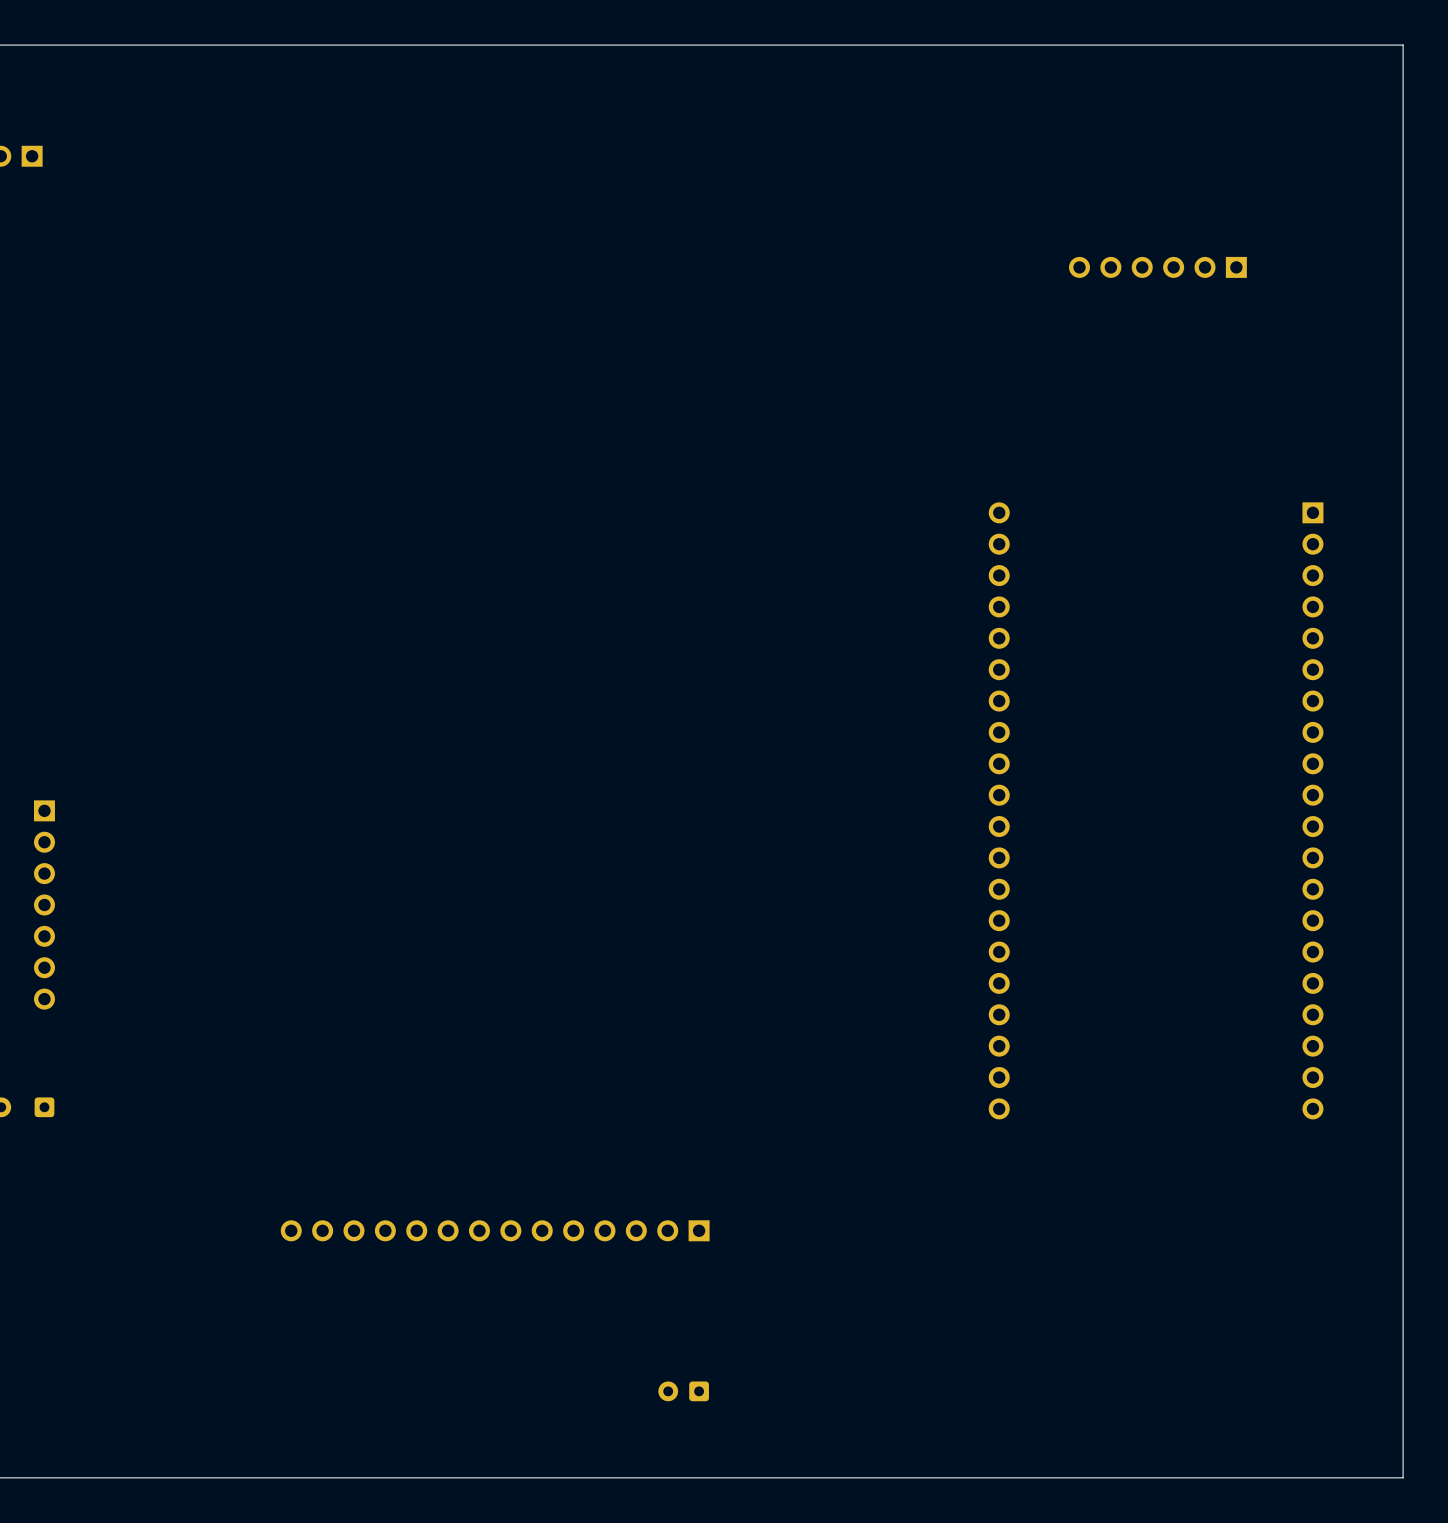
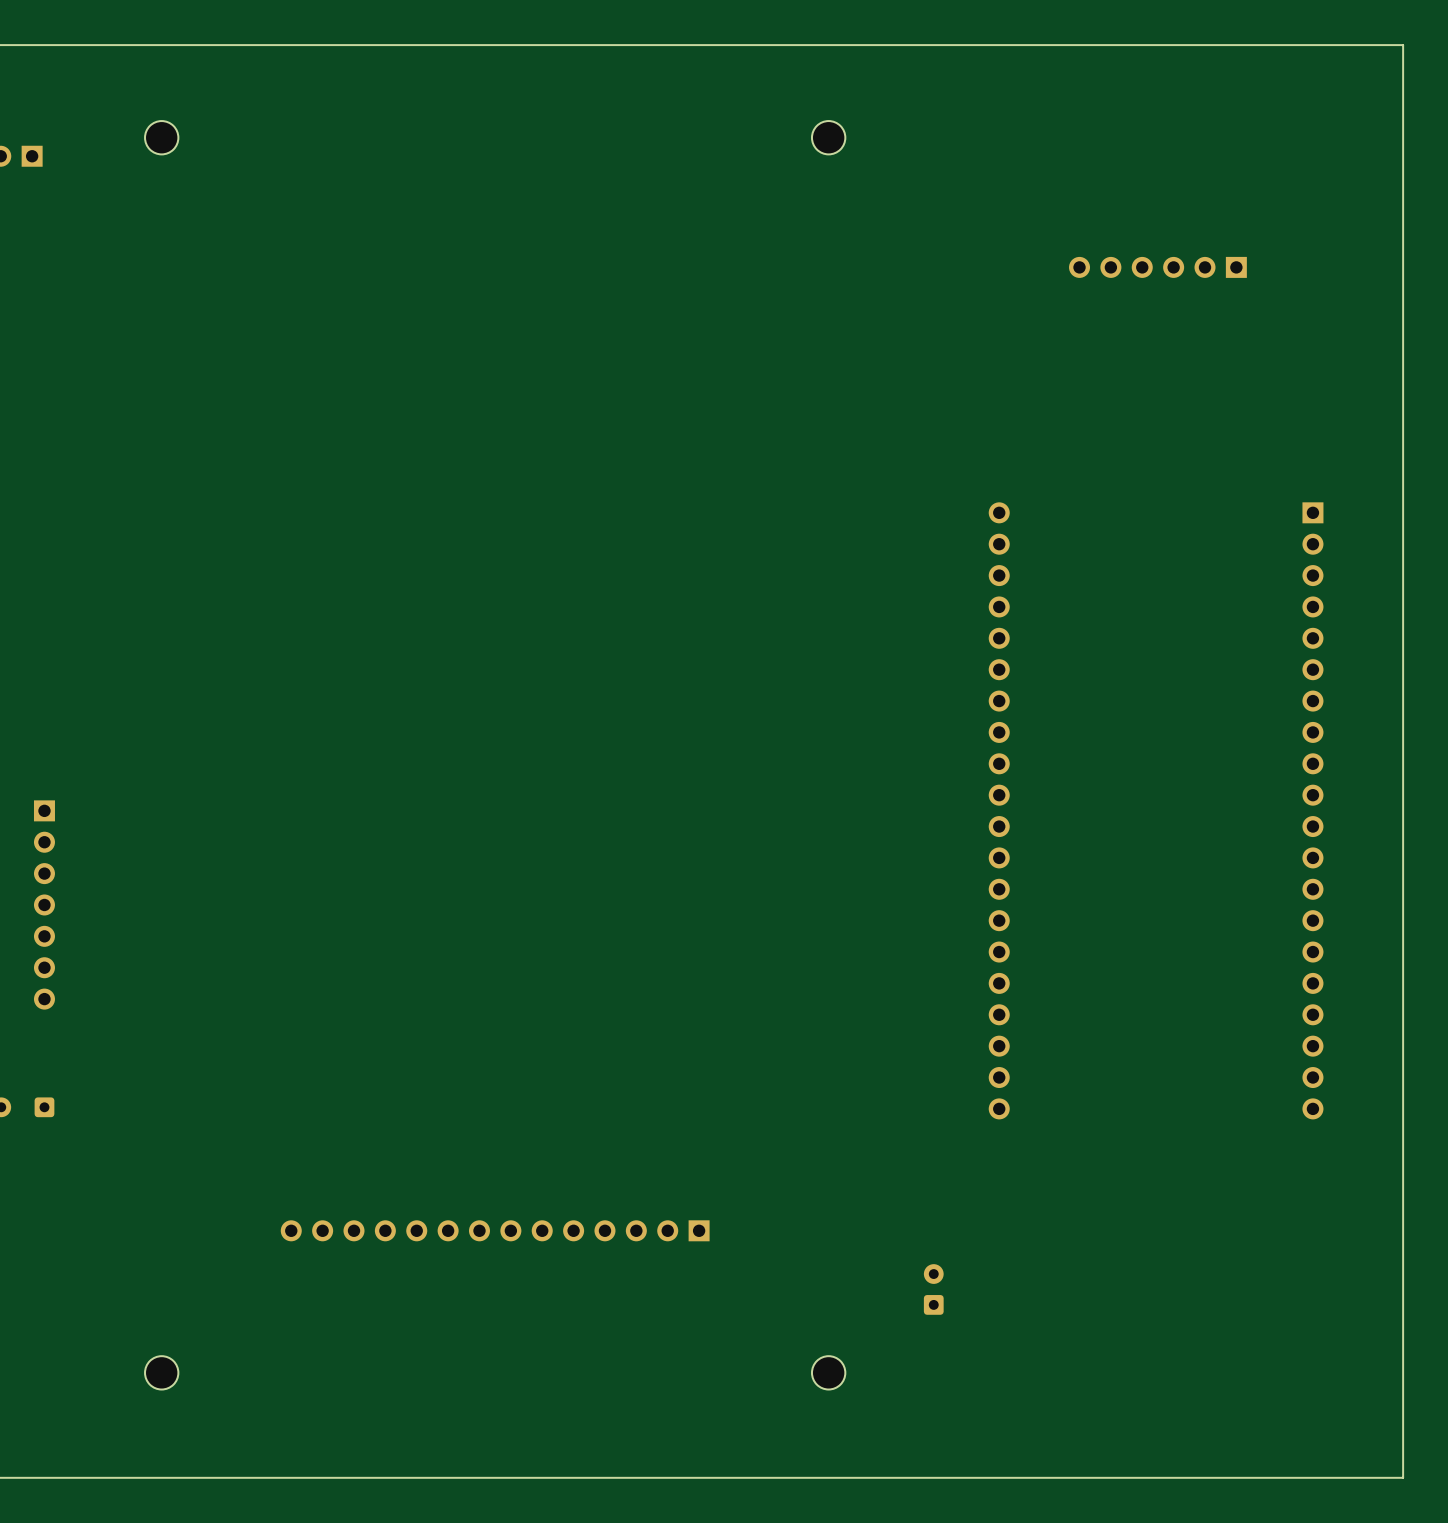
part: none -> (161, 137)
part: none -> (828, 137)
part: none -> (161, 1372)
part: none -> (828, 1372)
part rotation: 0° (683, 1391) -> 90° clockwise (933, 1289)
part position: (683, 1391) -> (933, 1289)

